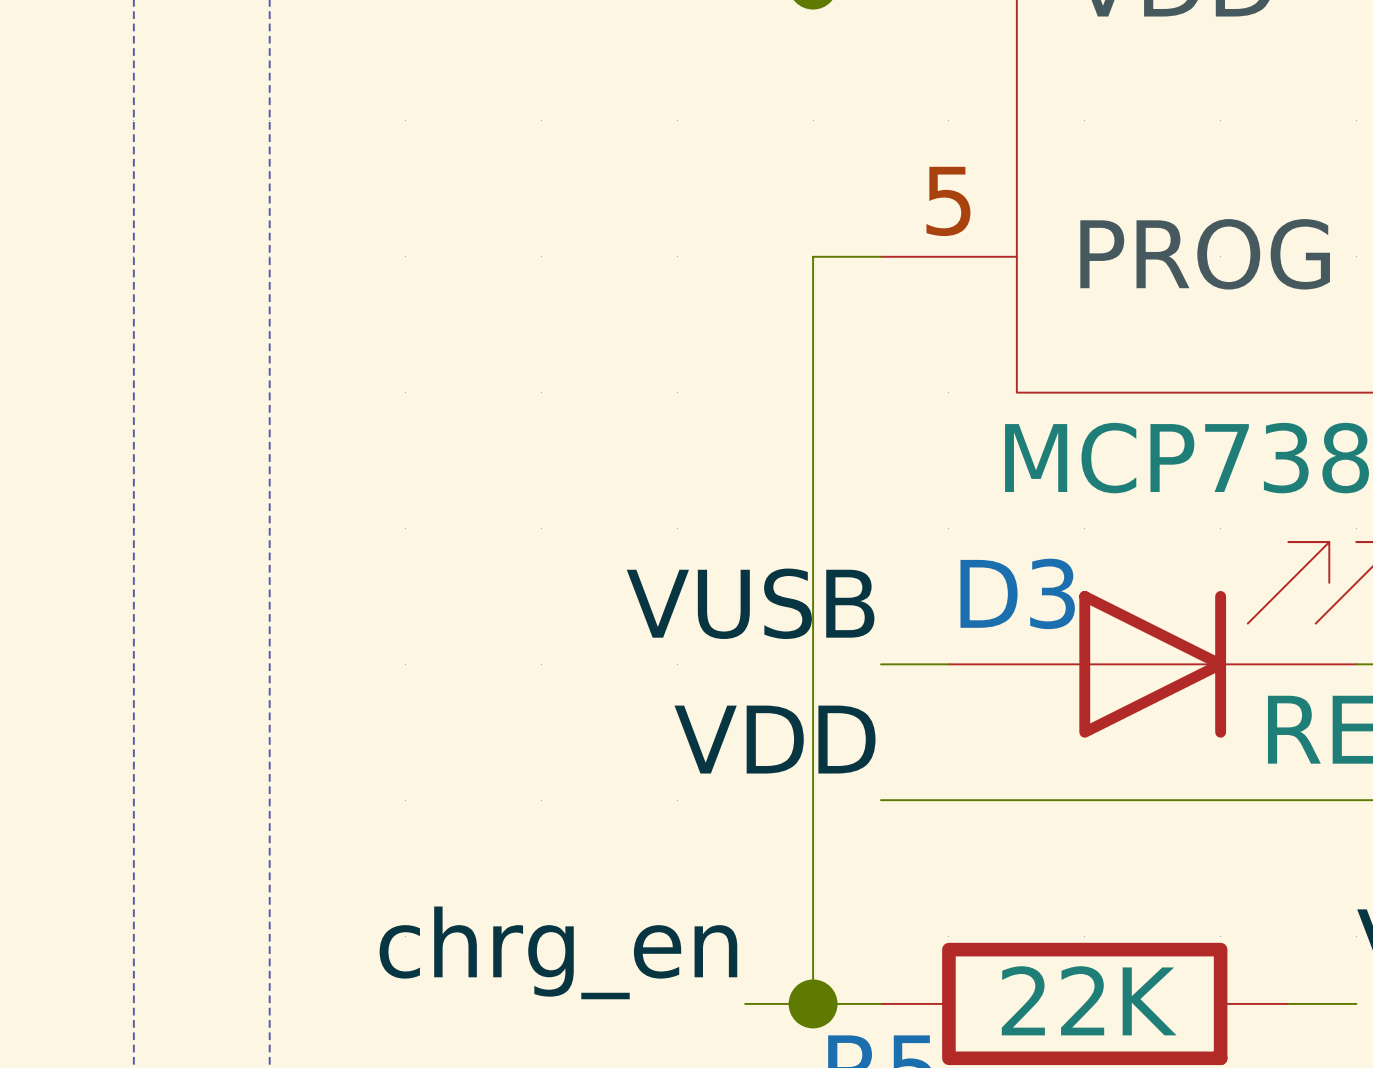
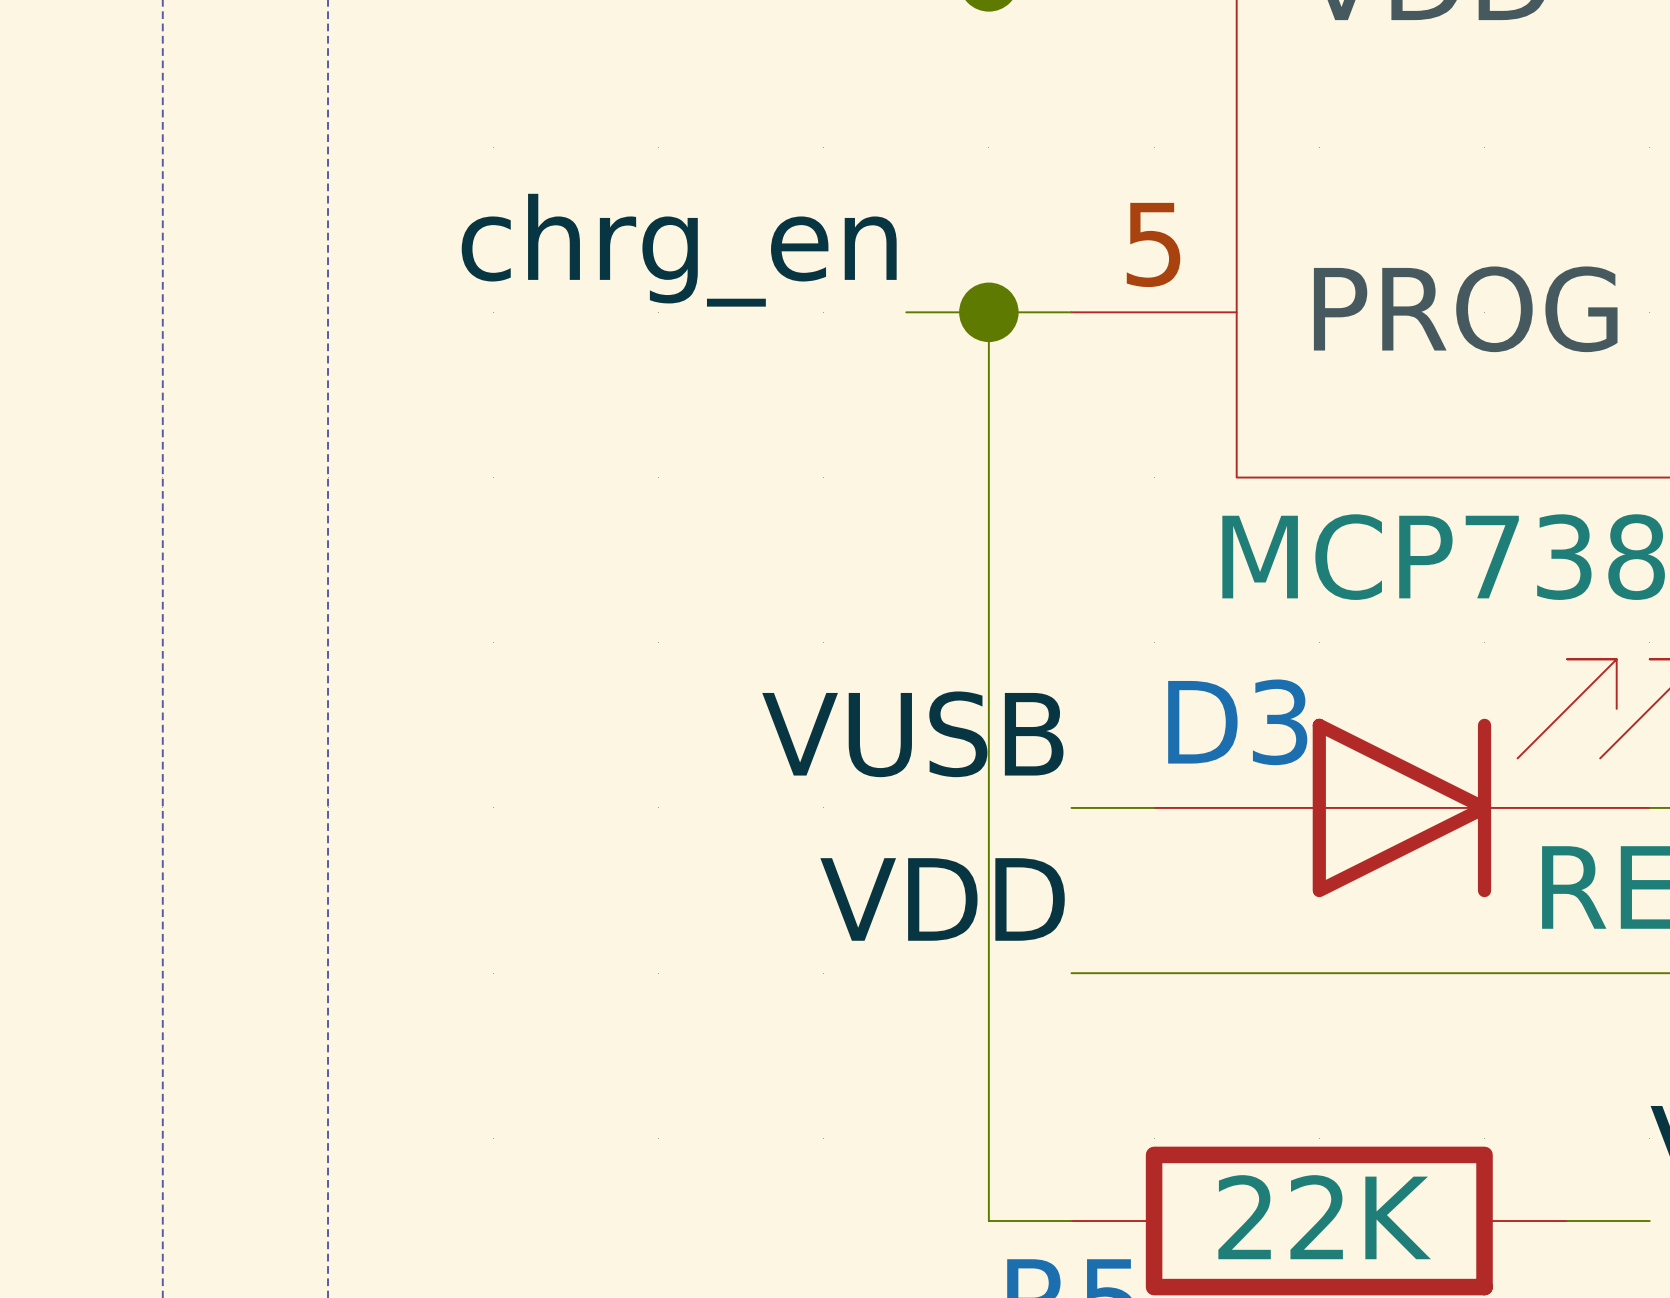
junction: none -> (988, 312)
label position: chrg_en (558, 952) -> chrg_en (679, 250)
wire: (745, 1003) (813, 1003) -> (906, 312) (988, 312)
junction: (813, 1003) -> none

